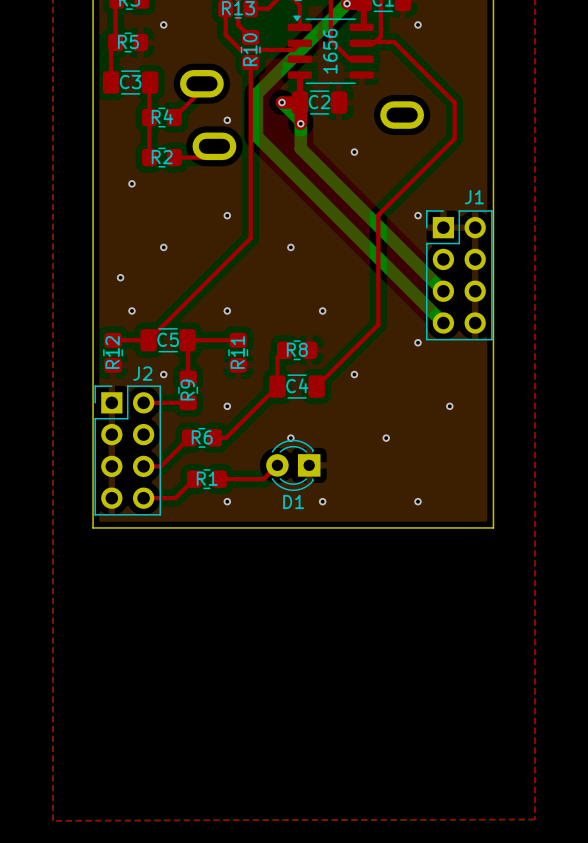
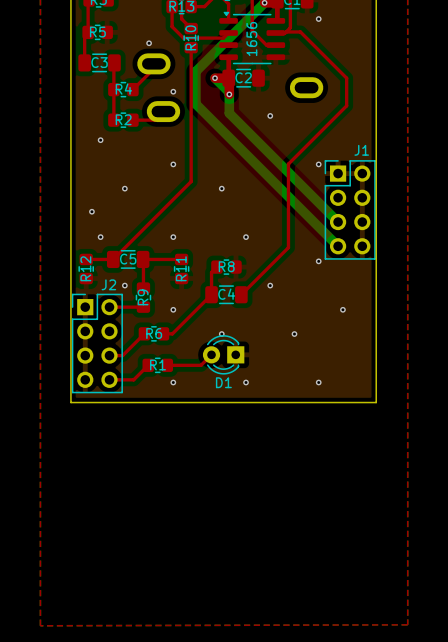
via: (163, 24) -> none
via: none -> (149, 43)

